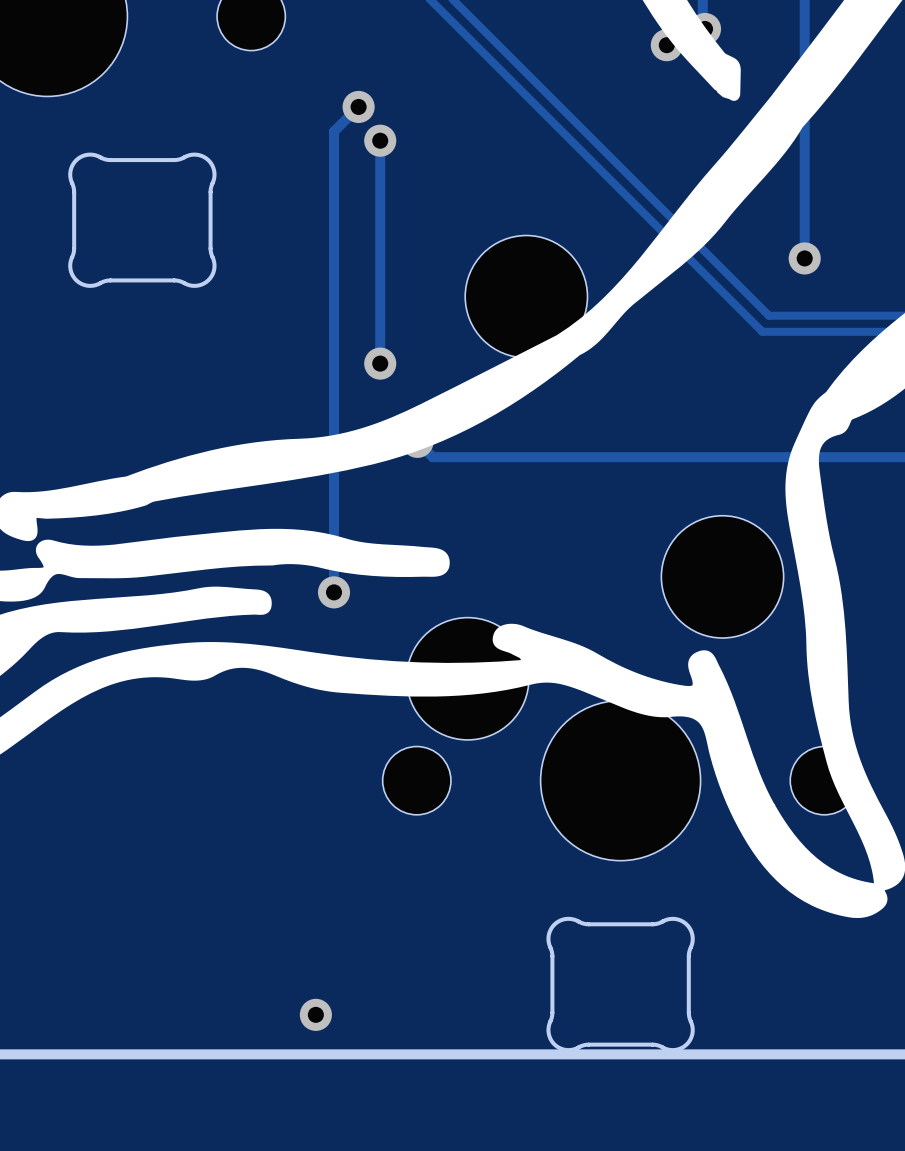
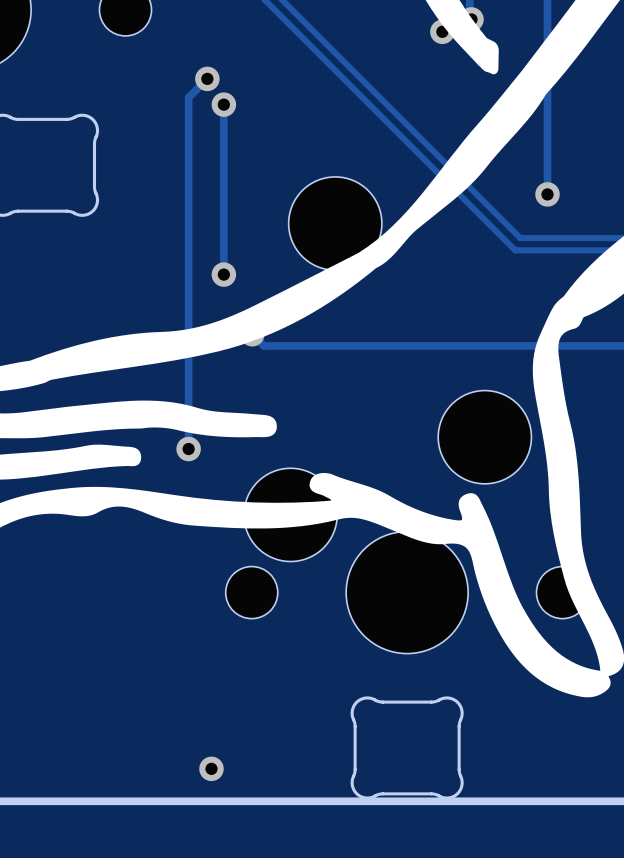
via position: (315, 1014) -> (211, 768)

